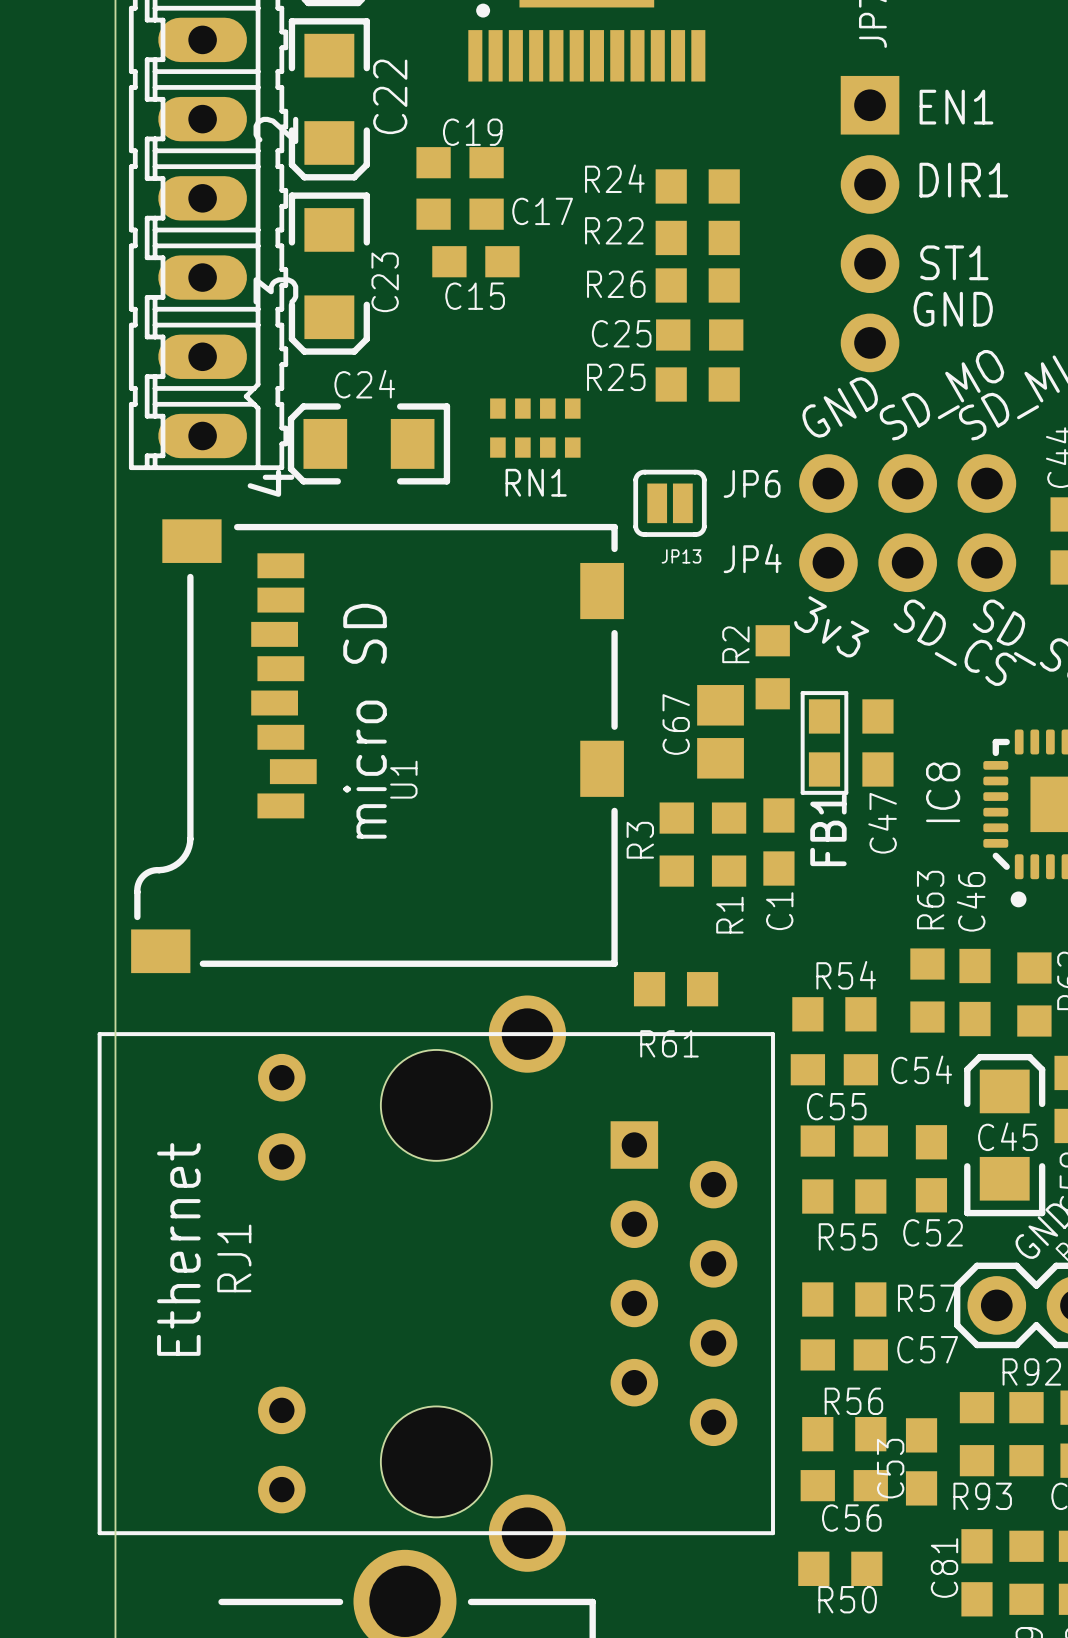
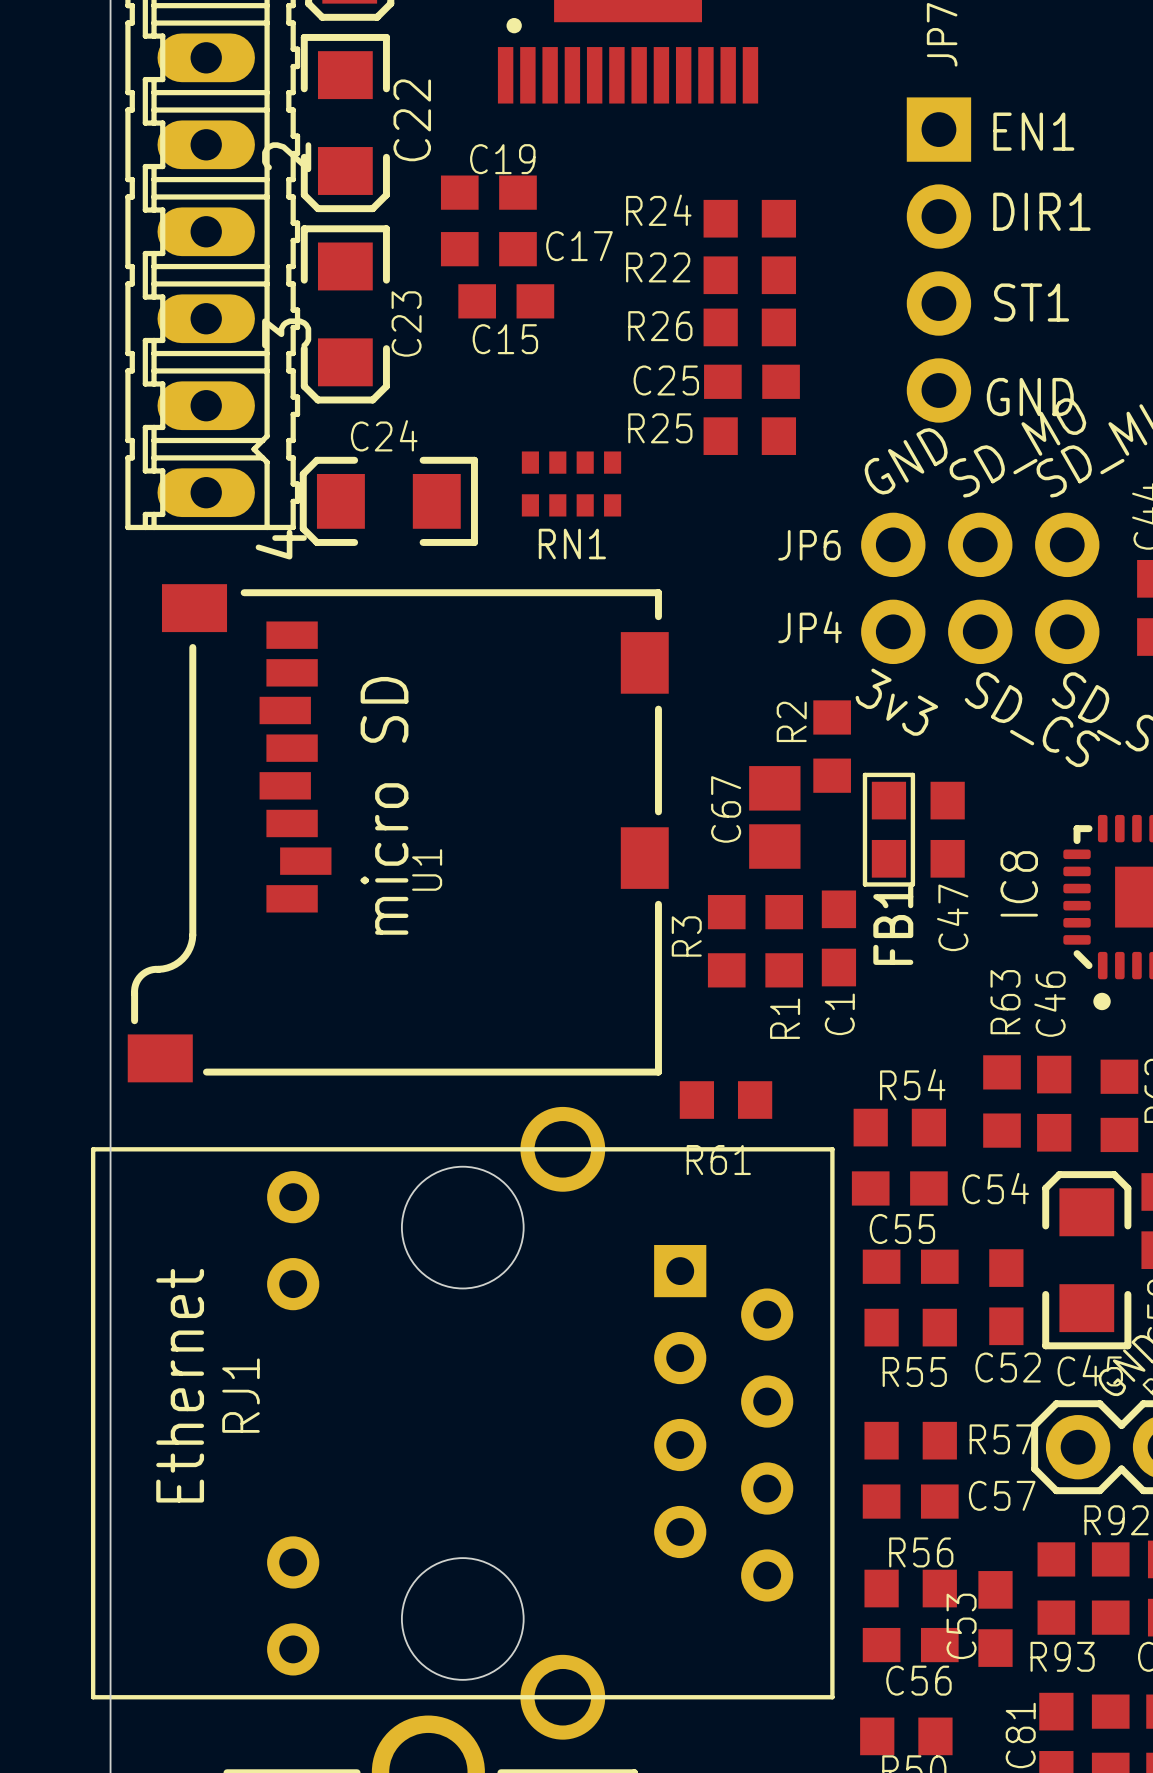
text position: GND (953, 309) -> GND (1030, 397)
JP13: (670, 503) -> none
C45 name position: C45 (1007, 1136) -> C45 (1090, 1370)

